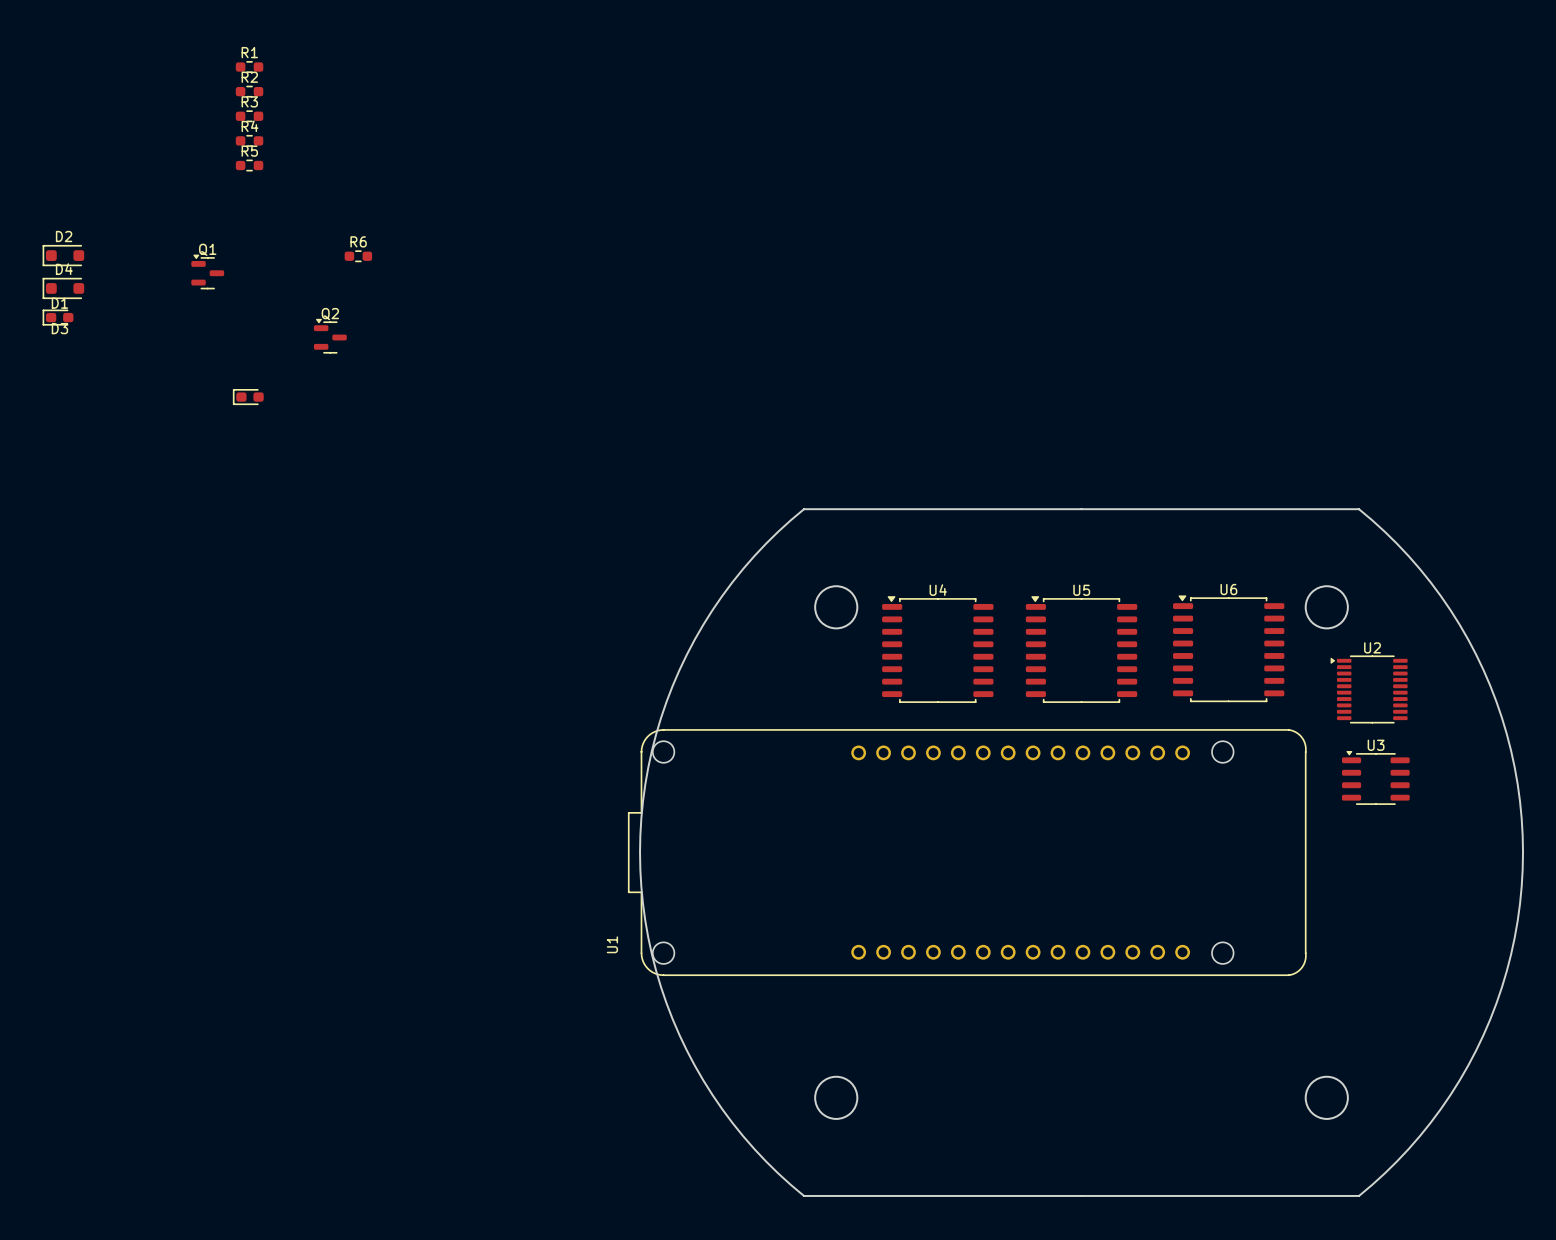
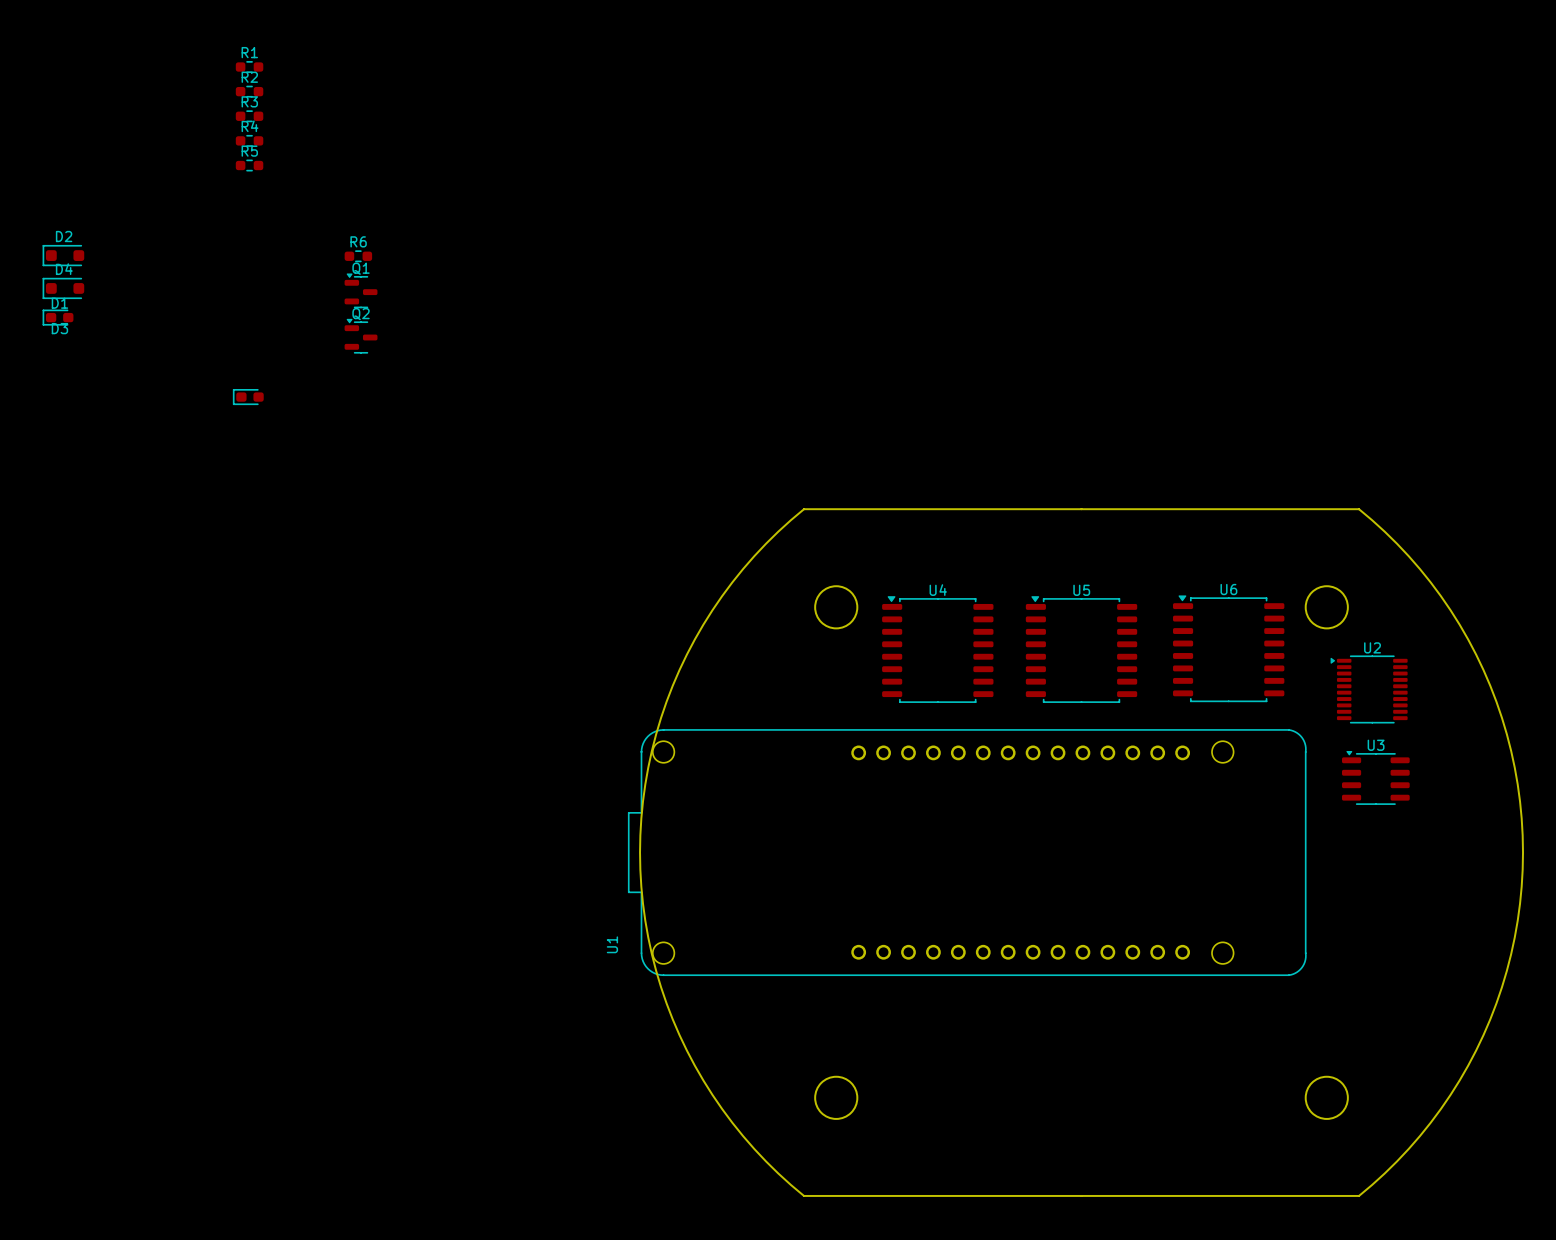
Q1 position: (207, 271) -> (361, 290)
Q2 position: (330, 336) -> (361, 336)

